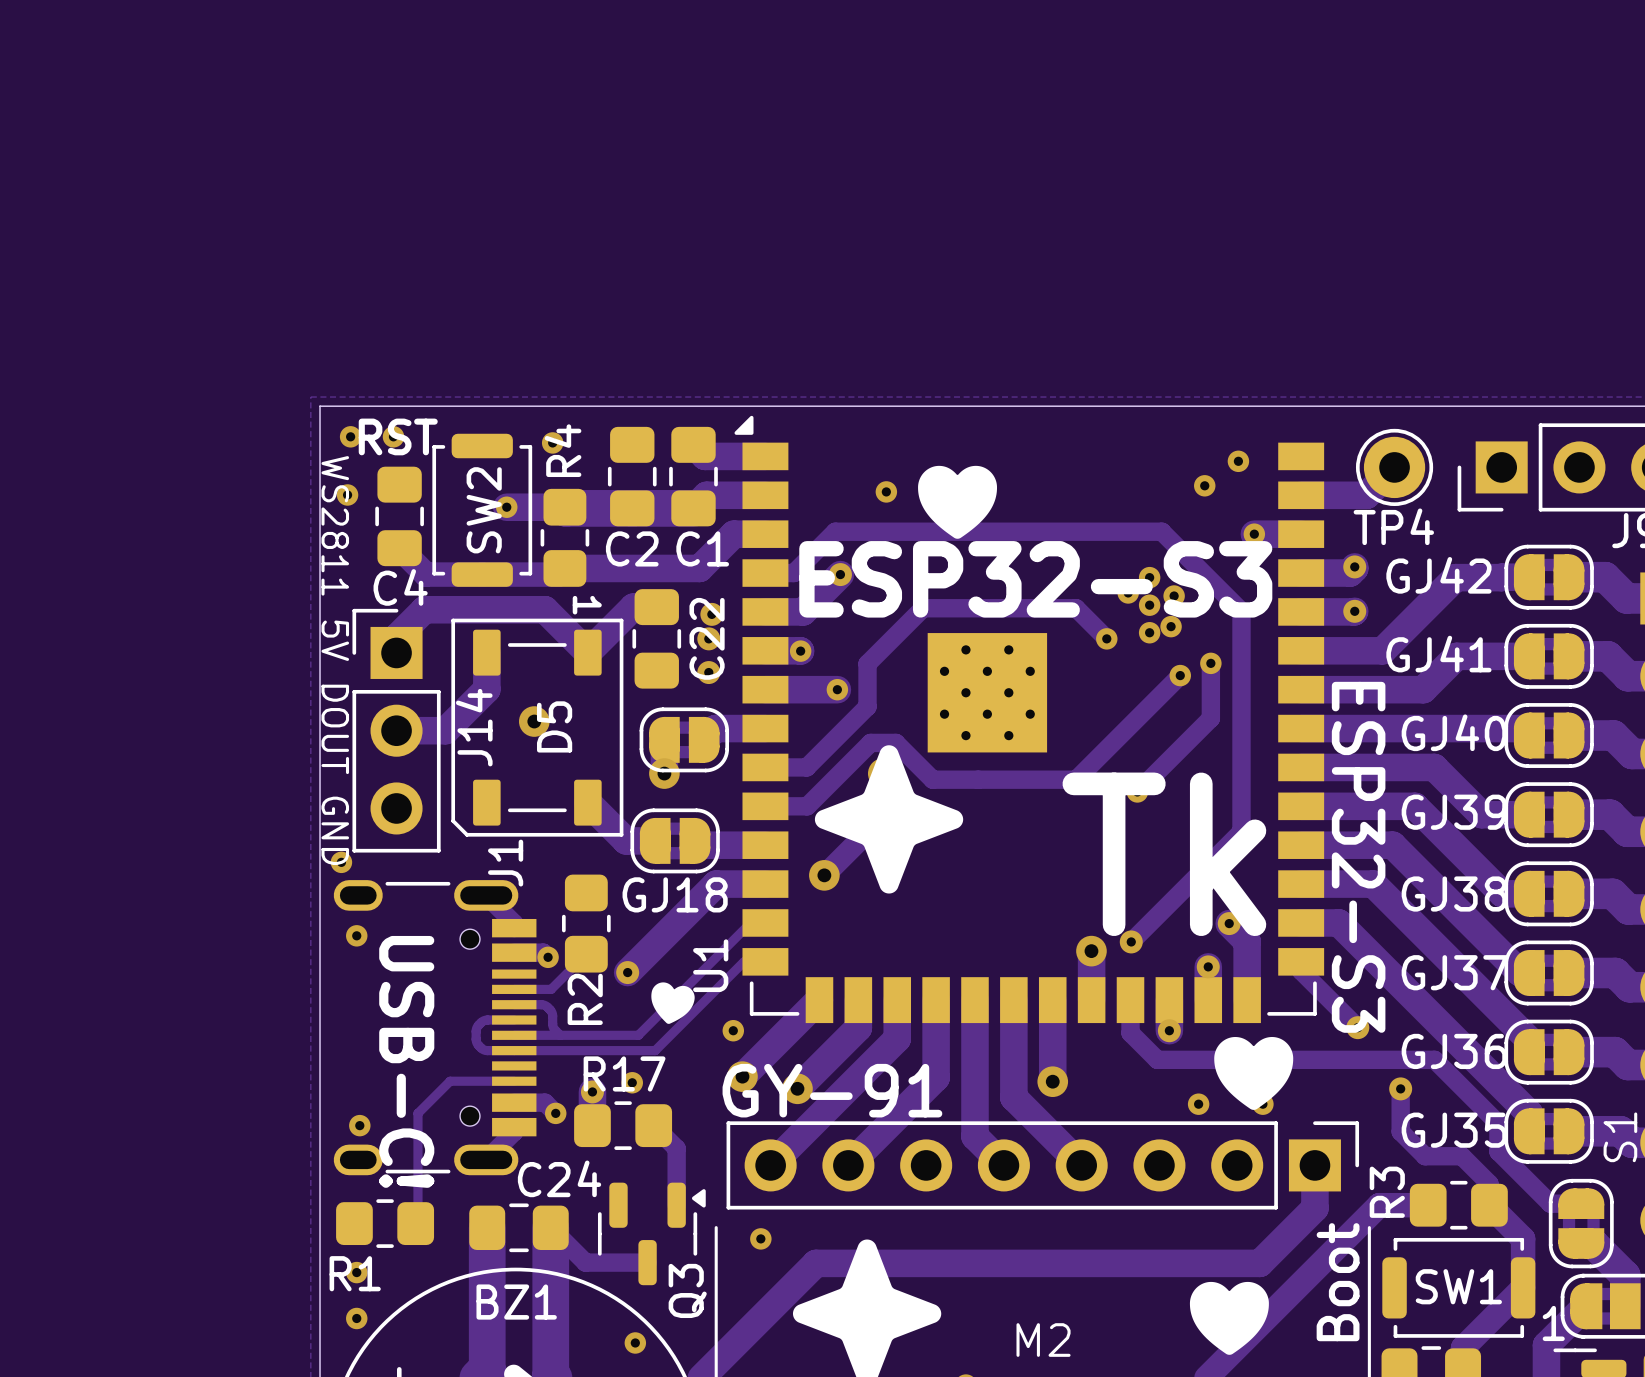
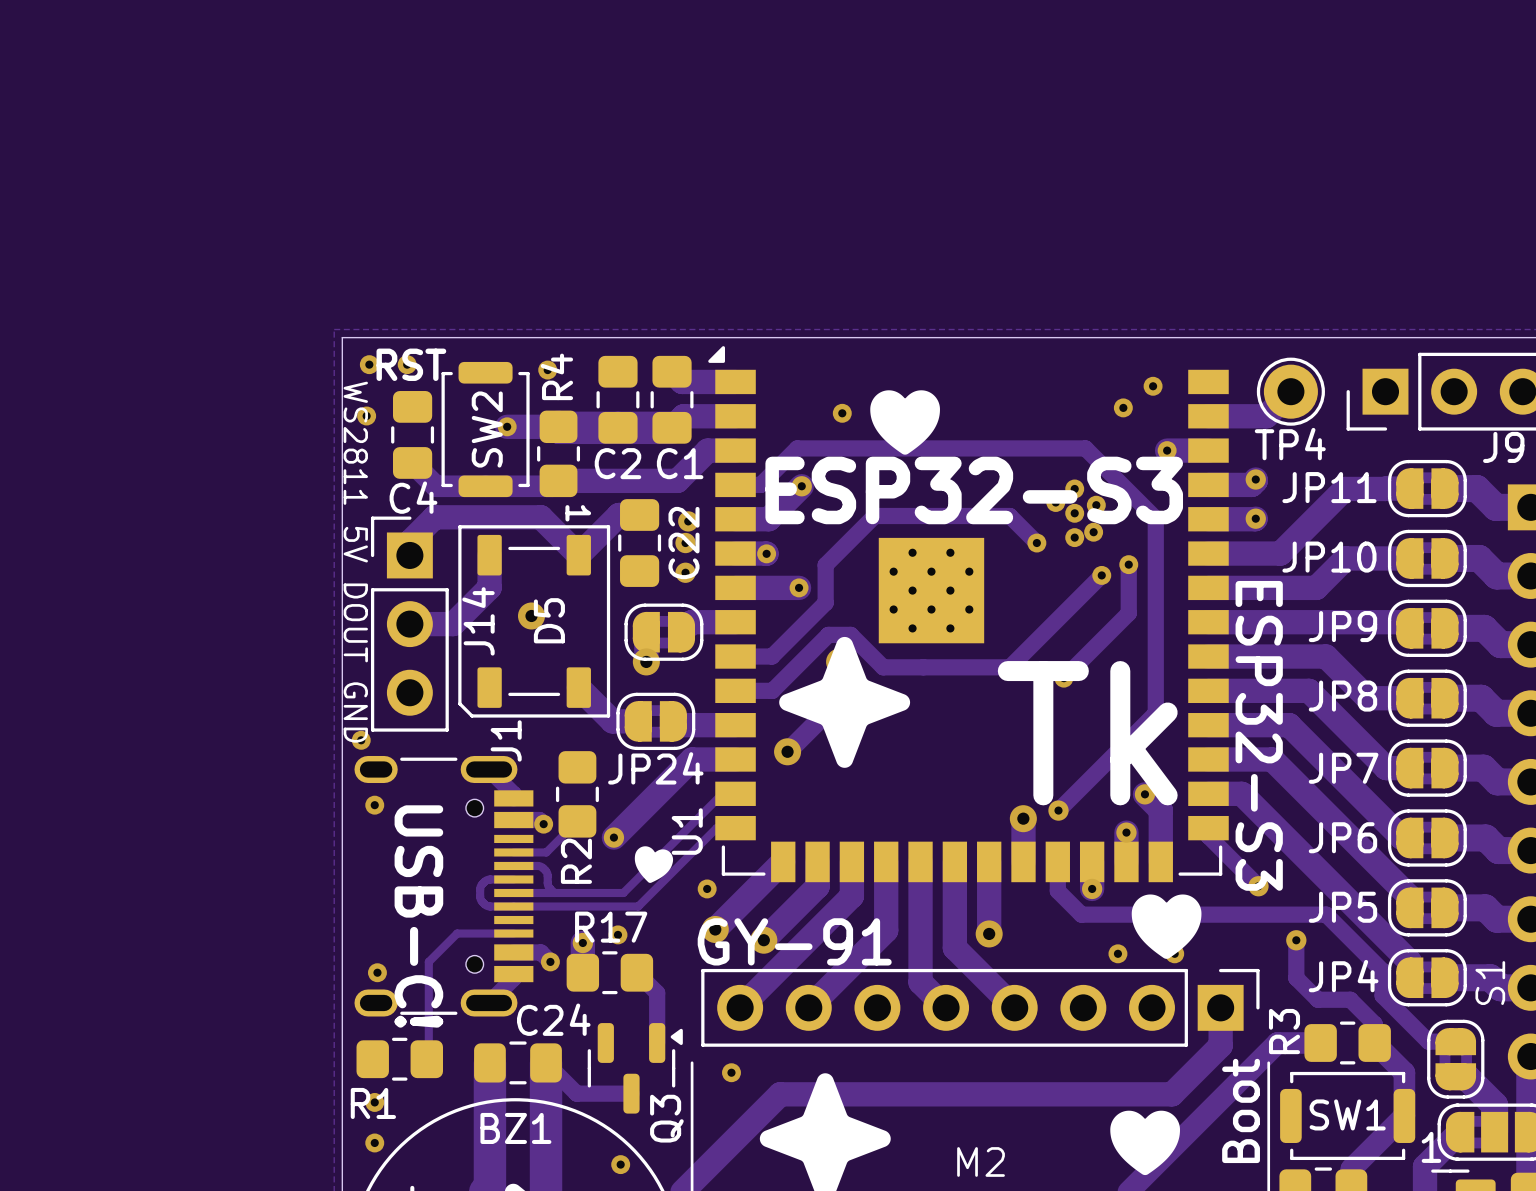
GJ42 name: GJ42 (1438, 575) -> JP11 (1329, 487)
GJ41 name: GJ41 (1438, 654) -> JP10 (1329, 557)
GJ40 name: GJ40 (1454, 732) -> JP9 (1342, 626)
GJ39 name: GJ39 (1454, 812) -> JP8 (1342, 696)
GJ18 name: GJ18 (675, 894) -> JP24 (655, 768)
GJ38 name: GJ38 (1454, 894) -> JP7 (1343, 768)
GJ37 name: GJ37 (1454, 972) -> JP6 (1342, 837)
GJ36 name: GJ36 (1454, 1051) -> JP5 (1342, 907)
GJ35 name: GJ35 (1454, 1130) -> JP4 (1343, 976)

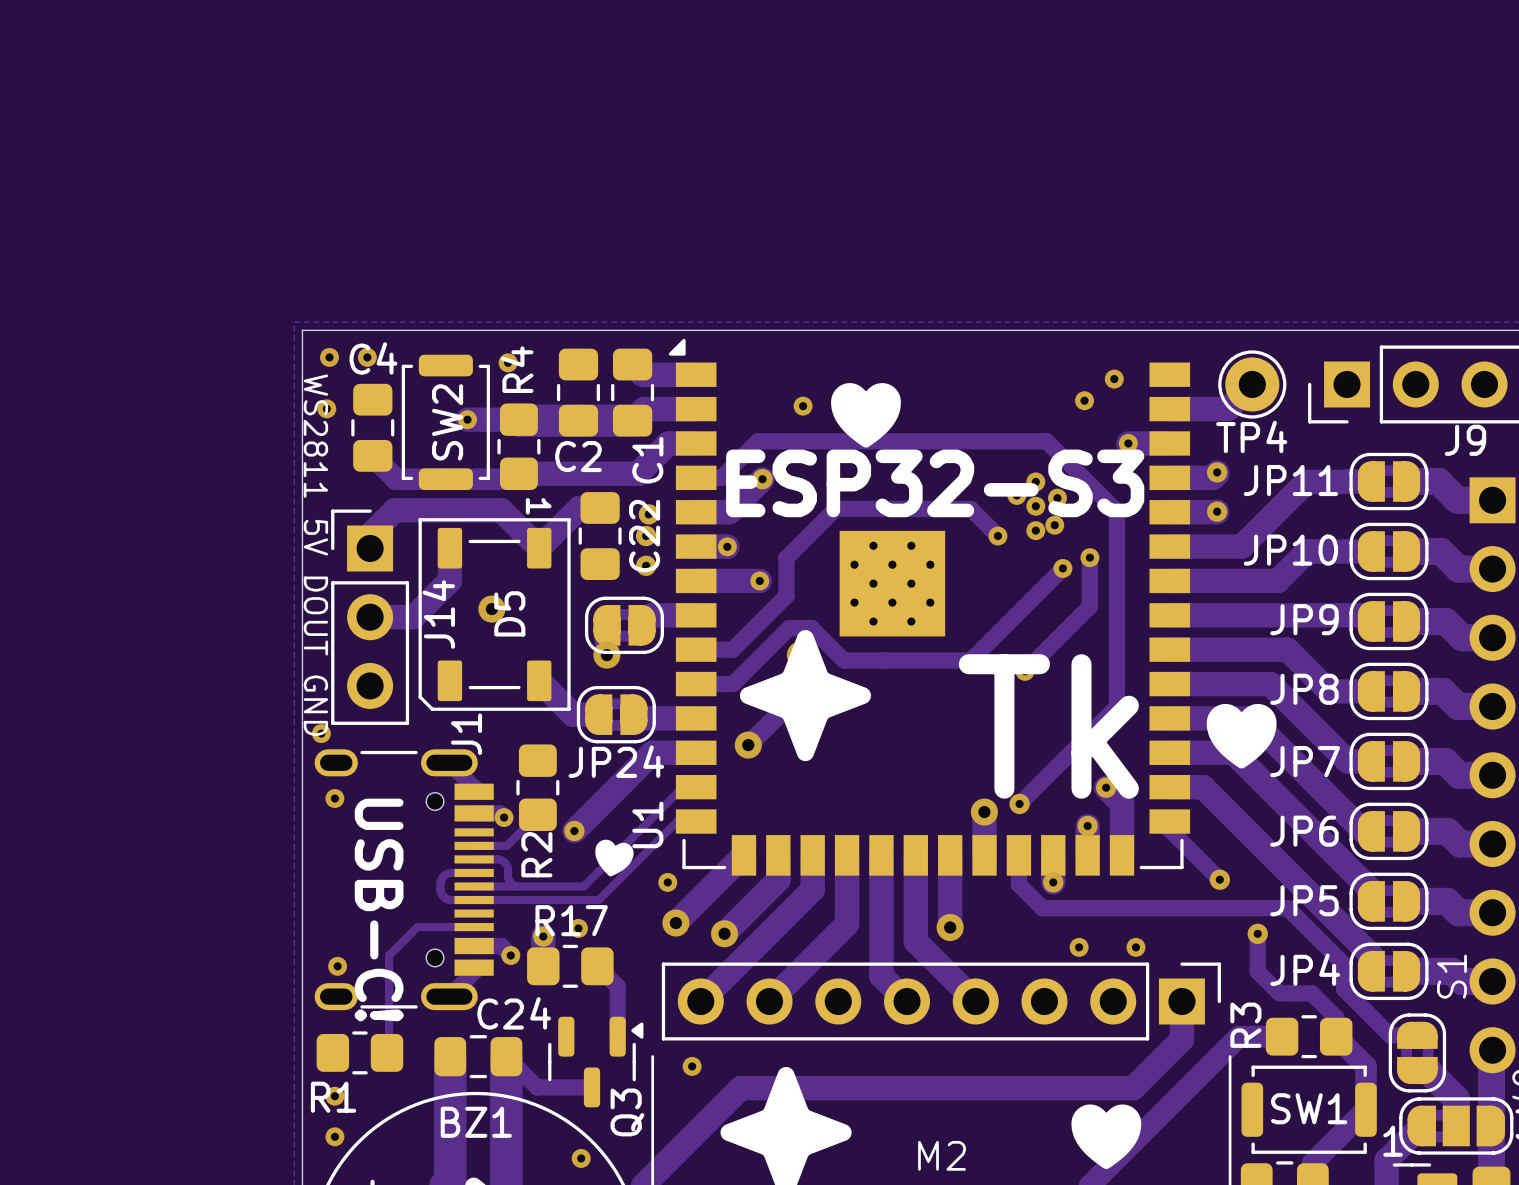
text: RST (411, 364) -> none
C1 name rotation: 0° (680, 463) -> 90° counterclockwise (647, 460)
C4 name position: C4 (413, 497) -> C4 (373, 358)
text: ESP32-S3 (1259, 735) -> none
drawing position: (1166, 926) -> (1241, 736)
text: GY-91 (794, 941) -> none
text: Boot (1241, 1110) -> none

